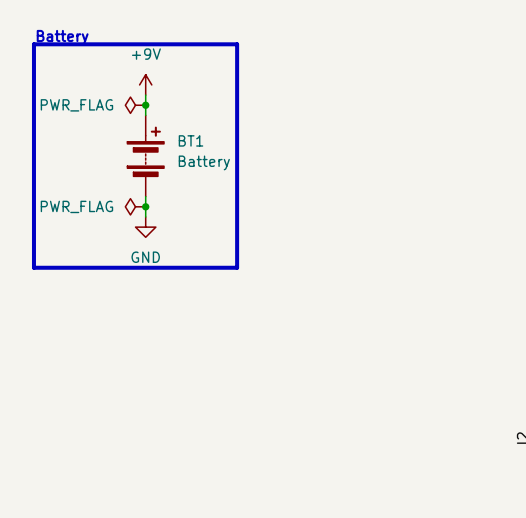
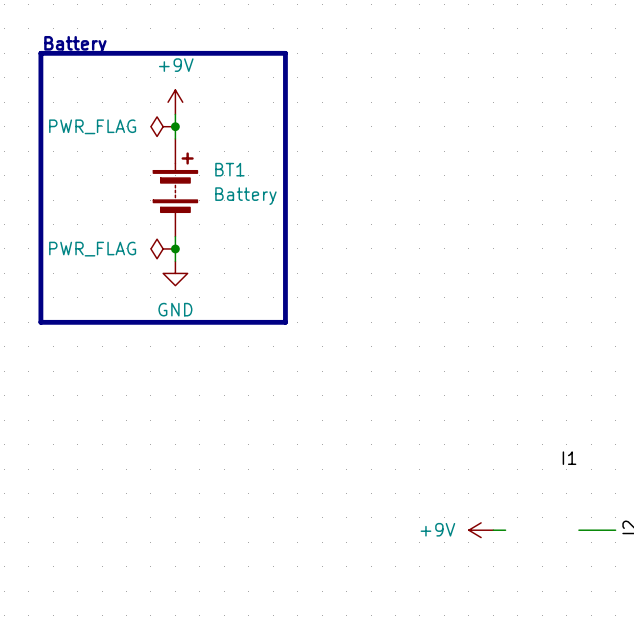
label: none -> I1 (569, 458)
power symbol: none -> +9V (481, 530)
wire: none -> (493, 530) (505, 530)
wire: none -> (578, 530) (615, 530)

